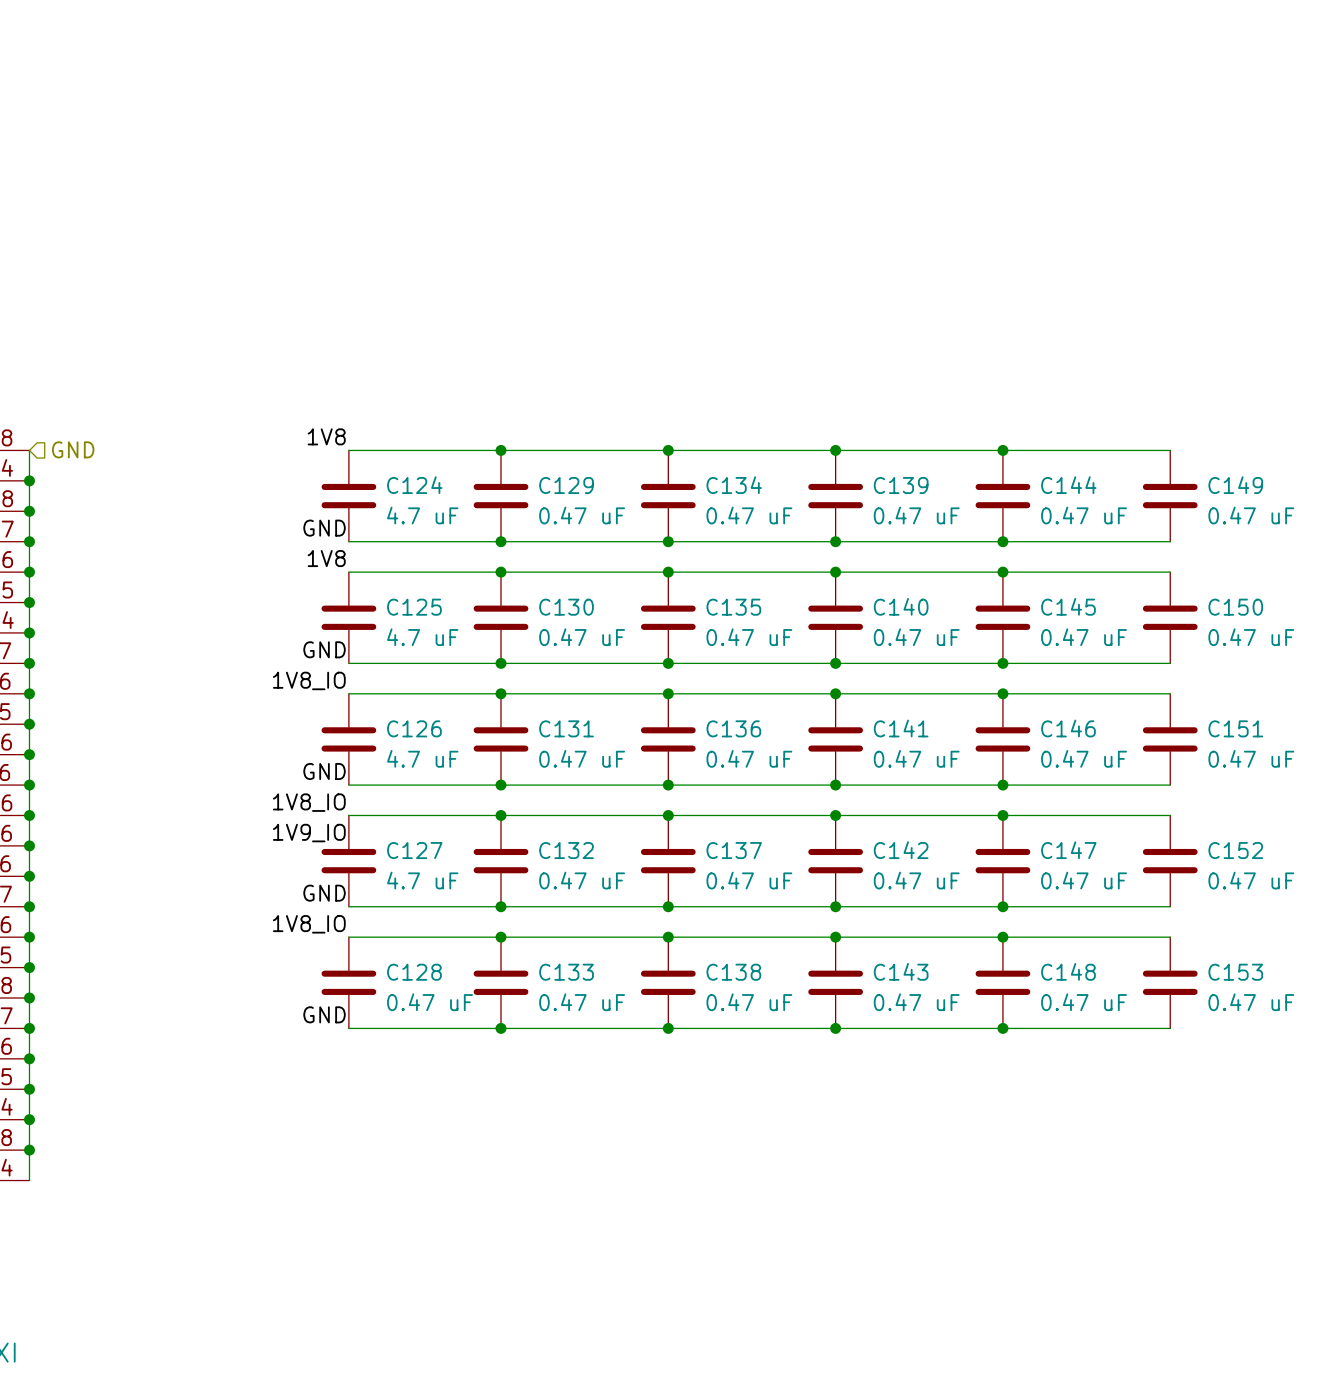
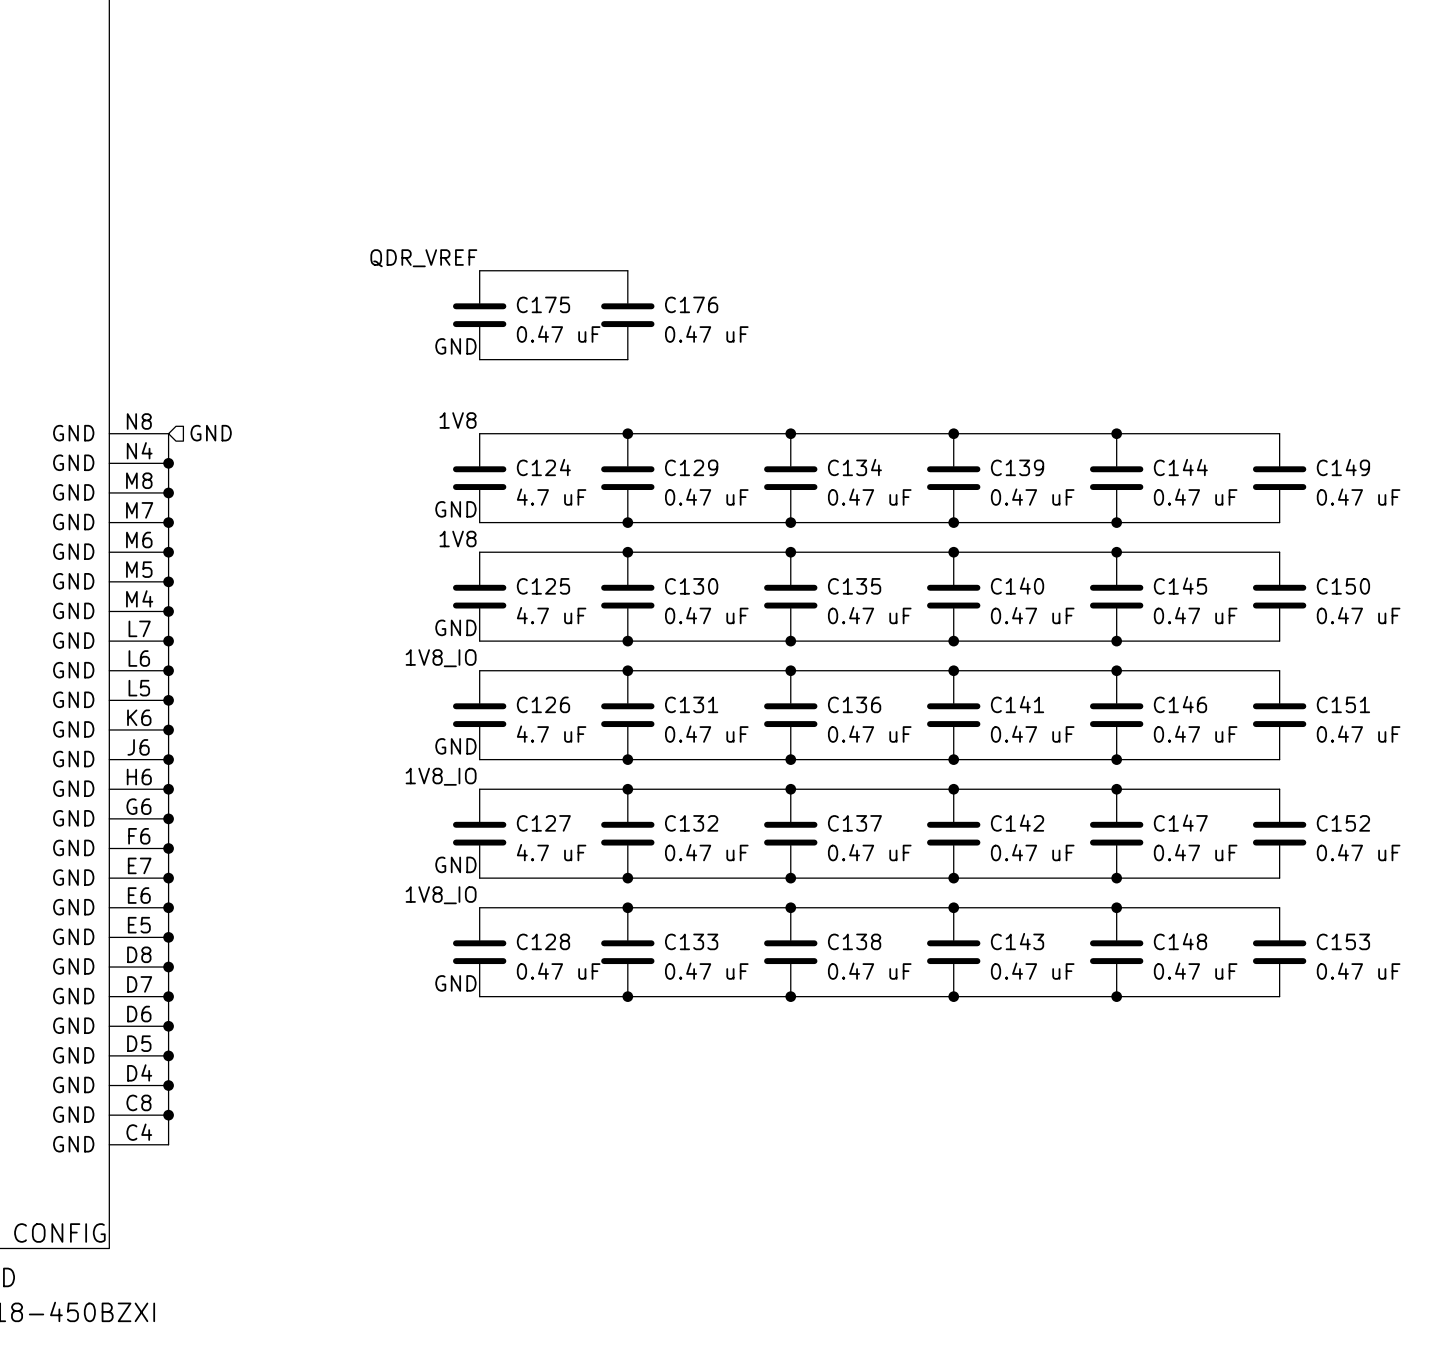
label: none -> QDR_VREF (423, 258)
wire: none -> (479, 270) (627, 270)
C175: none -> 0.47 uF (479, 315)
C176: none -> 0.47 uF (627, 315)
label: none -> GND (455, 346)
wire: none -> (479, 359) (627, 359)
label: 1V9_IO (309, 833) -> none

